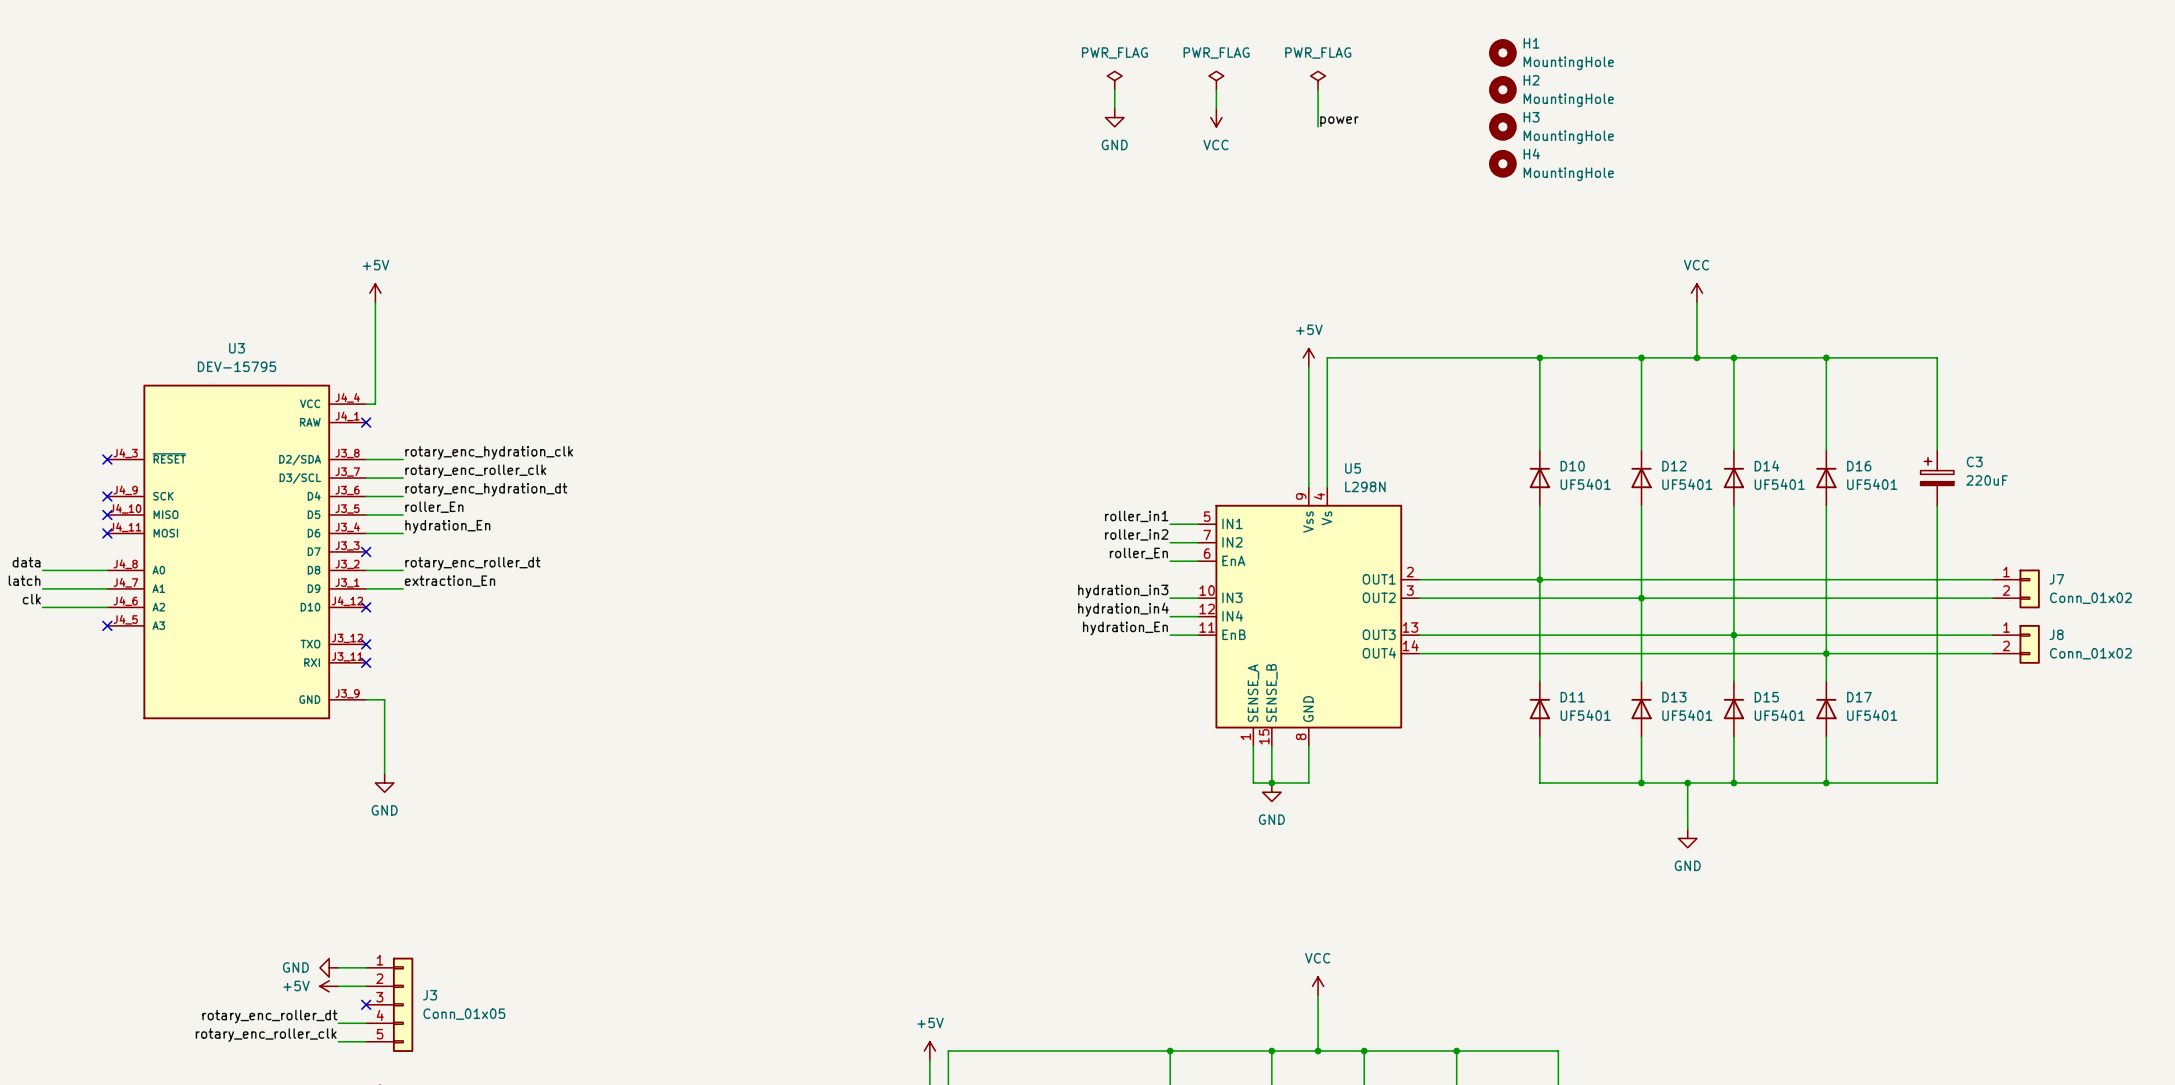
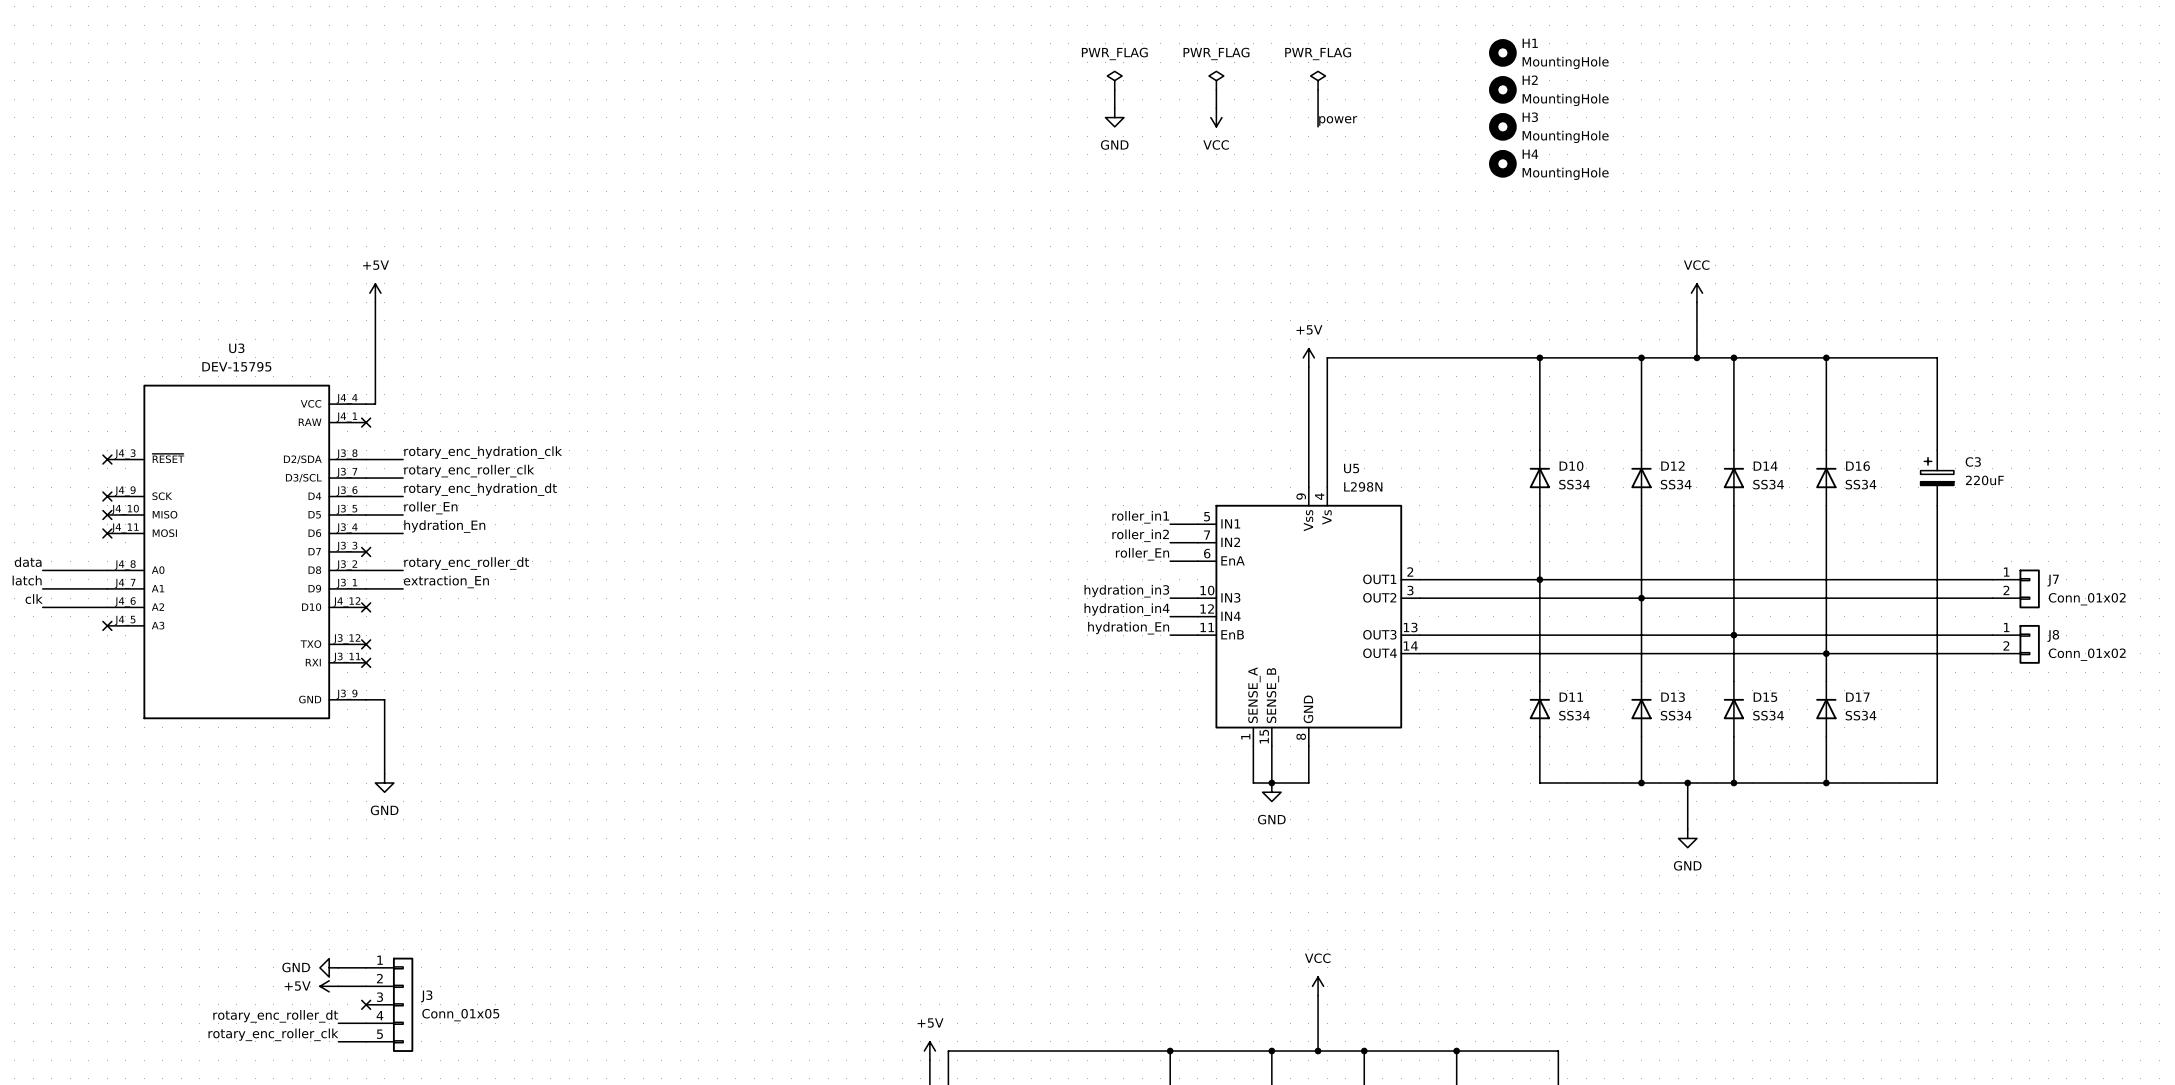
D10 value: UF5401 (1585, 484) -> SS34 (1574, 484)
D12 value: UF5401 (1687, 484) -> SS34 (1676, 484)
D14 value: UF5401 (1779, 484) -> SS34 (1768, 484)
D16 value: UF5401 (1872, 484) -> SS34 (1861, 484)
D11 value: UF5401 (1585, 715) -> SS34 (1574, 715)
D13 value: UF5401 (1687, 715) -> SS34 (1676, 715)
D15 value: UF5401 (1779, 715) -> SS34 (1768, 715)
D17 value: UF5401 (1872, 715) -> SS34 (1861, 715)

